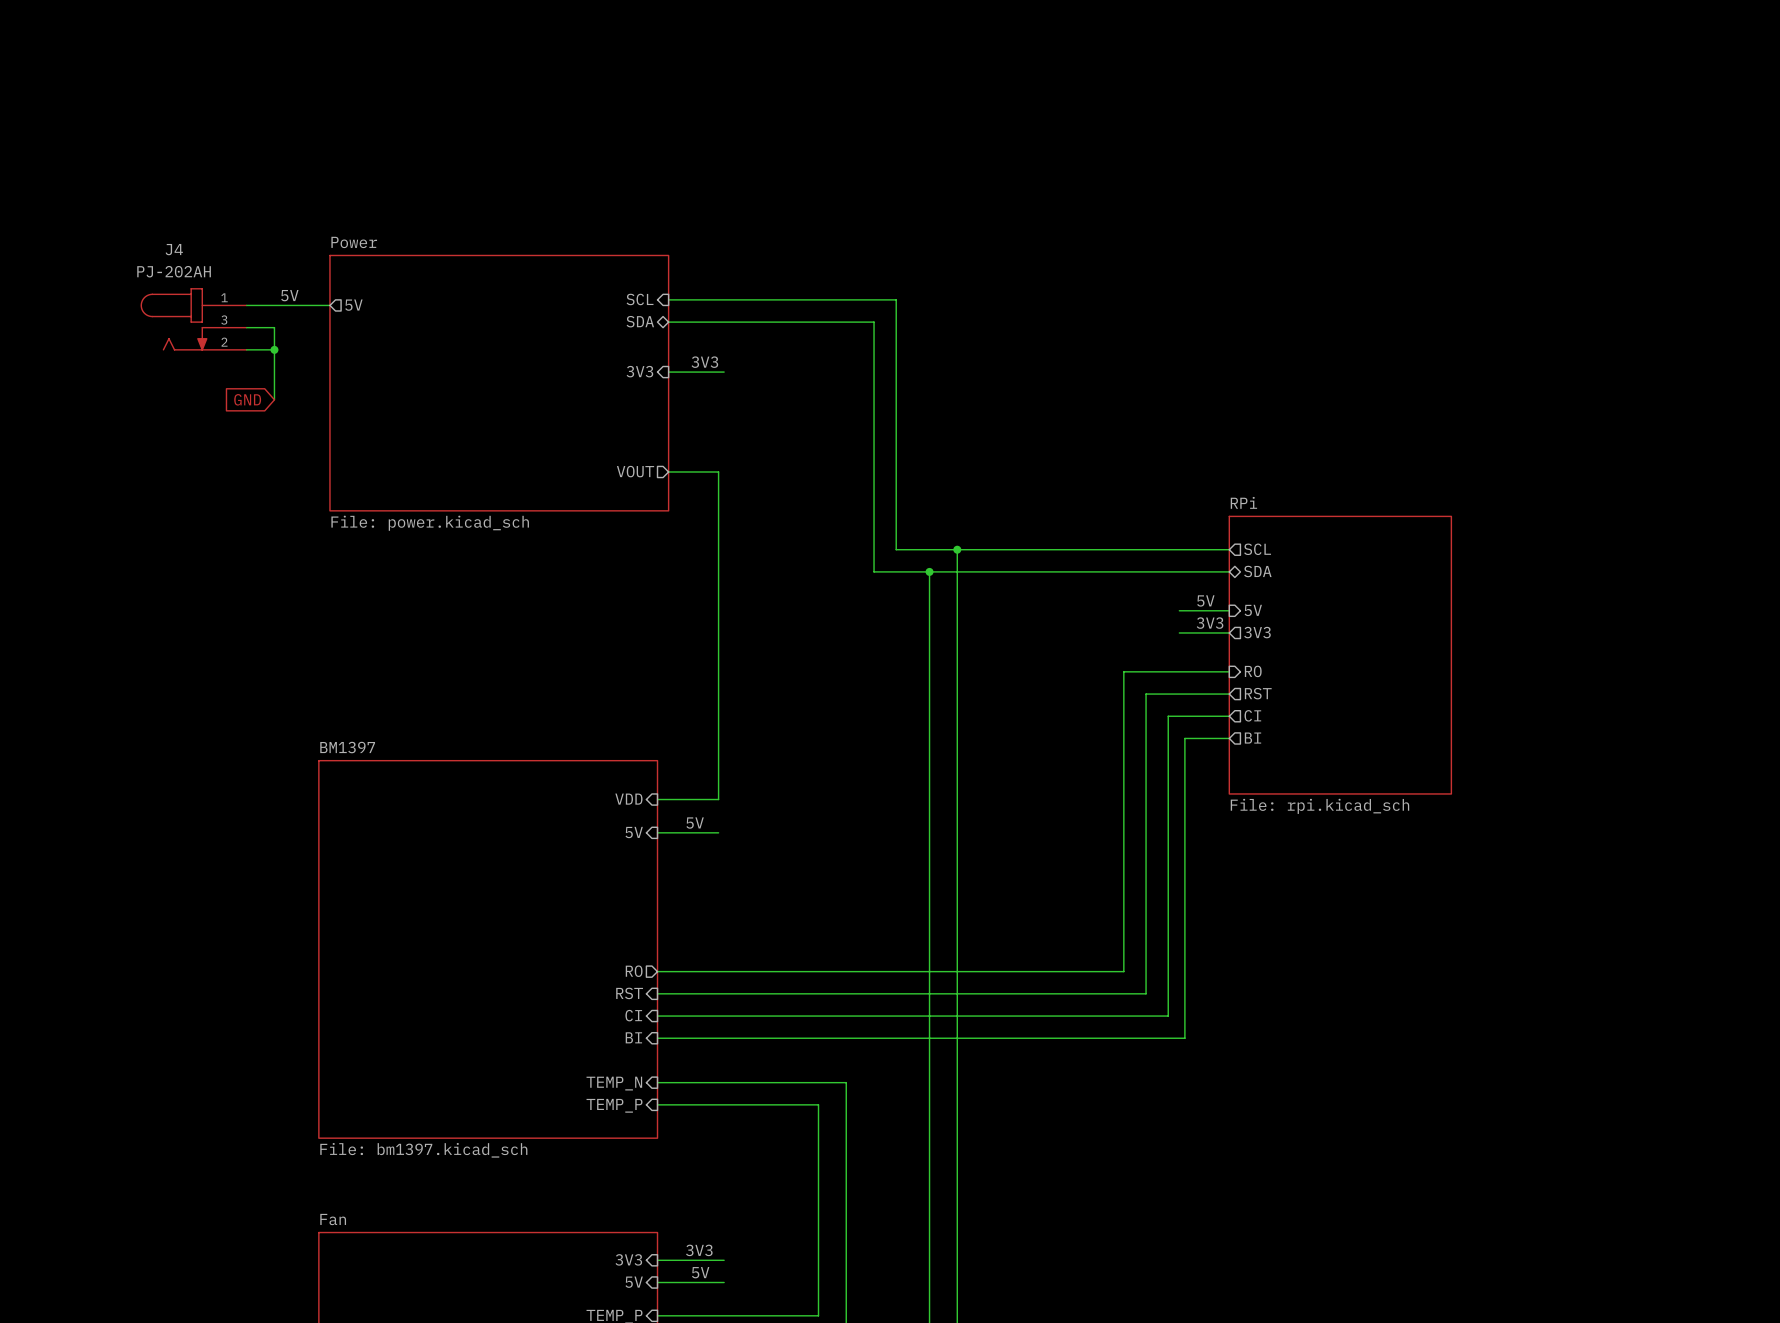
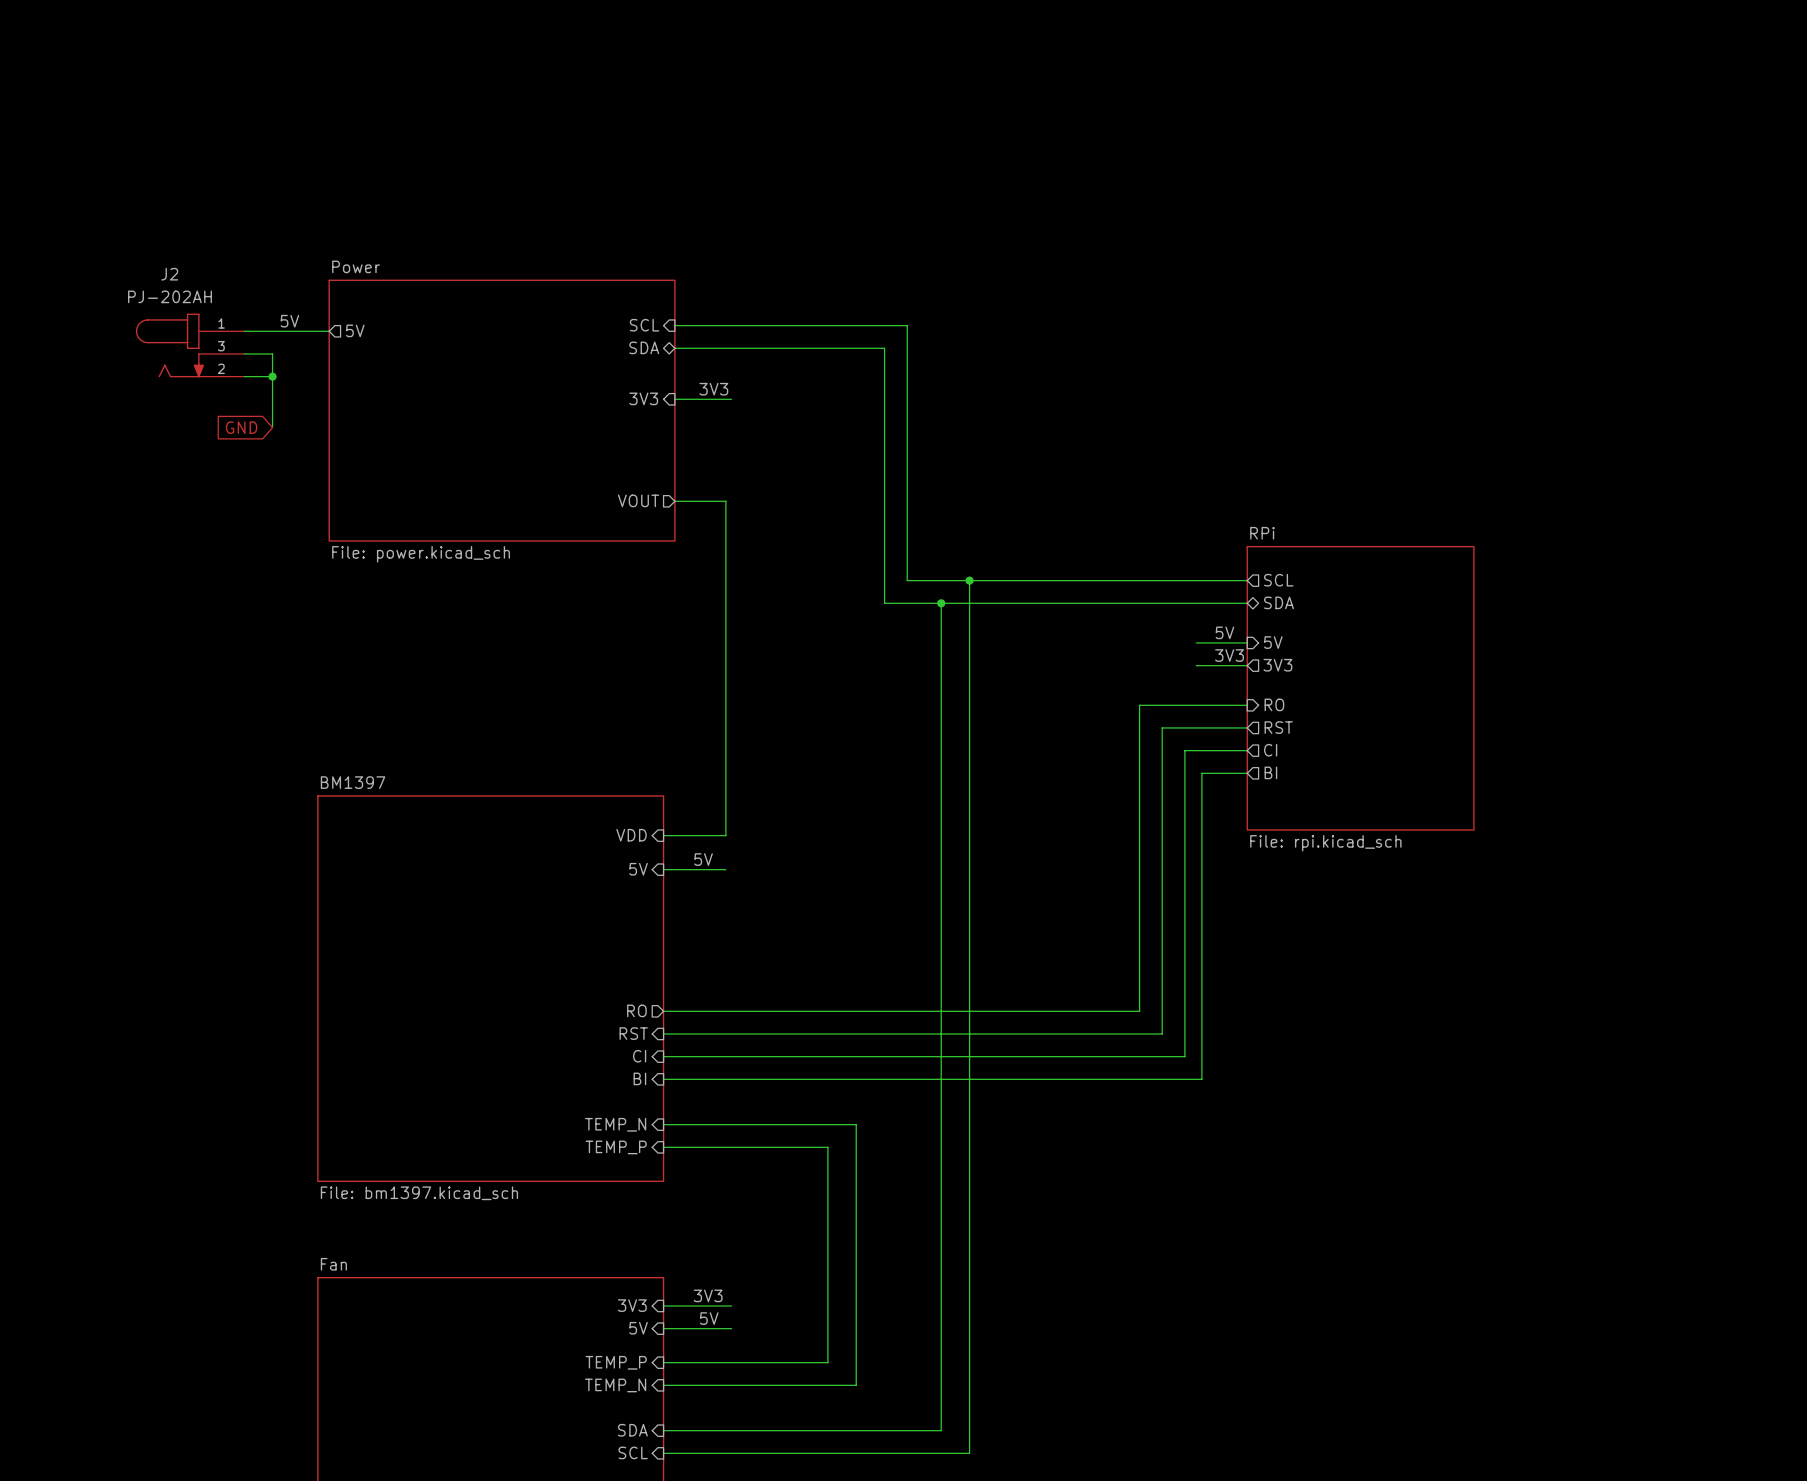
J4 name: J4 (174, 249) -> J2 (169, 274)

